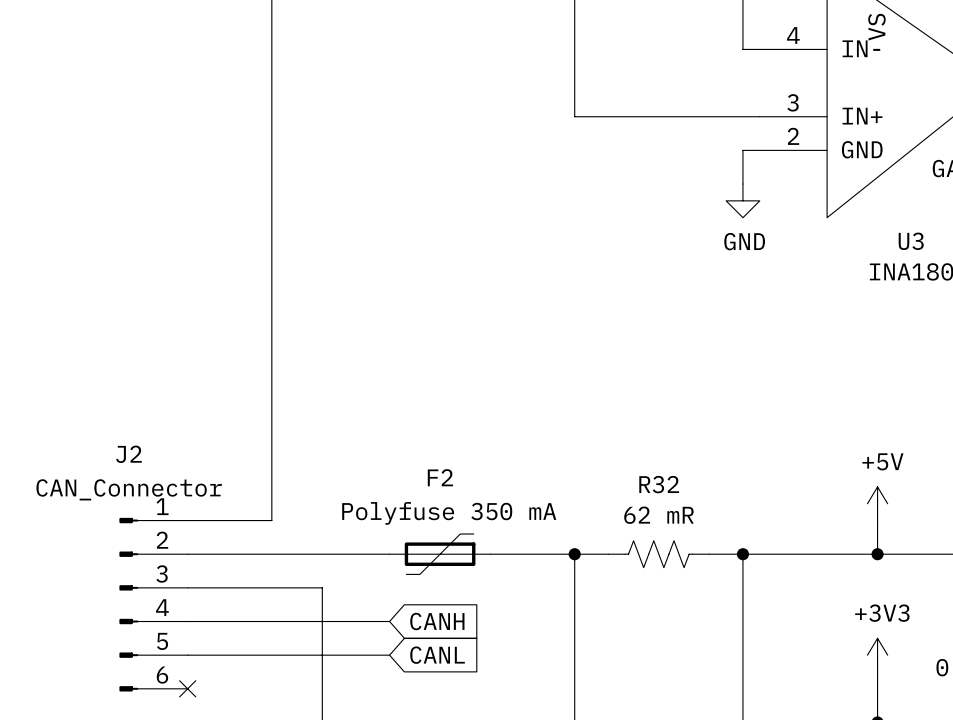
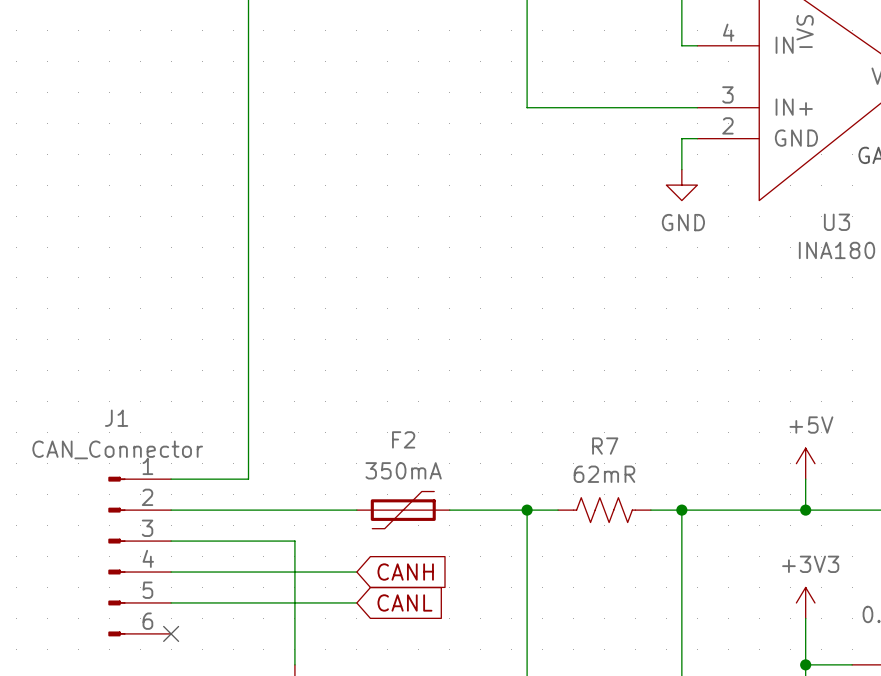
J2 name: J2 (128, 454) -> J1 (116, 418)
R32 name: R32 (659, 484) -> R7 (605, 446)
F2 value: Polyfuse 350 mA (449, 513) -> 350mA (403, 470)
R32 value: 62 mR (658, 515) -> 62mR (604, 474)

